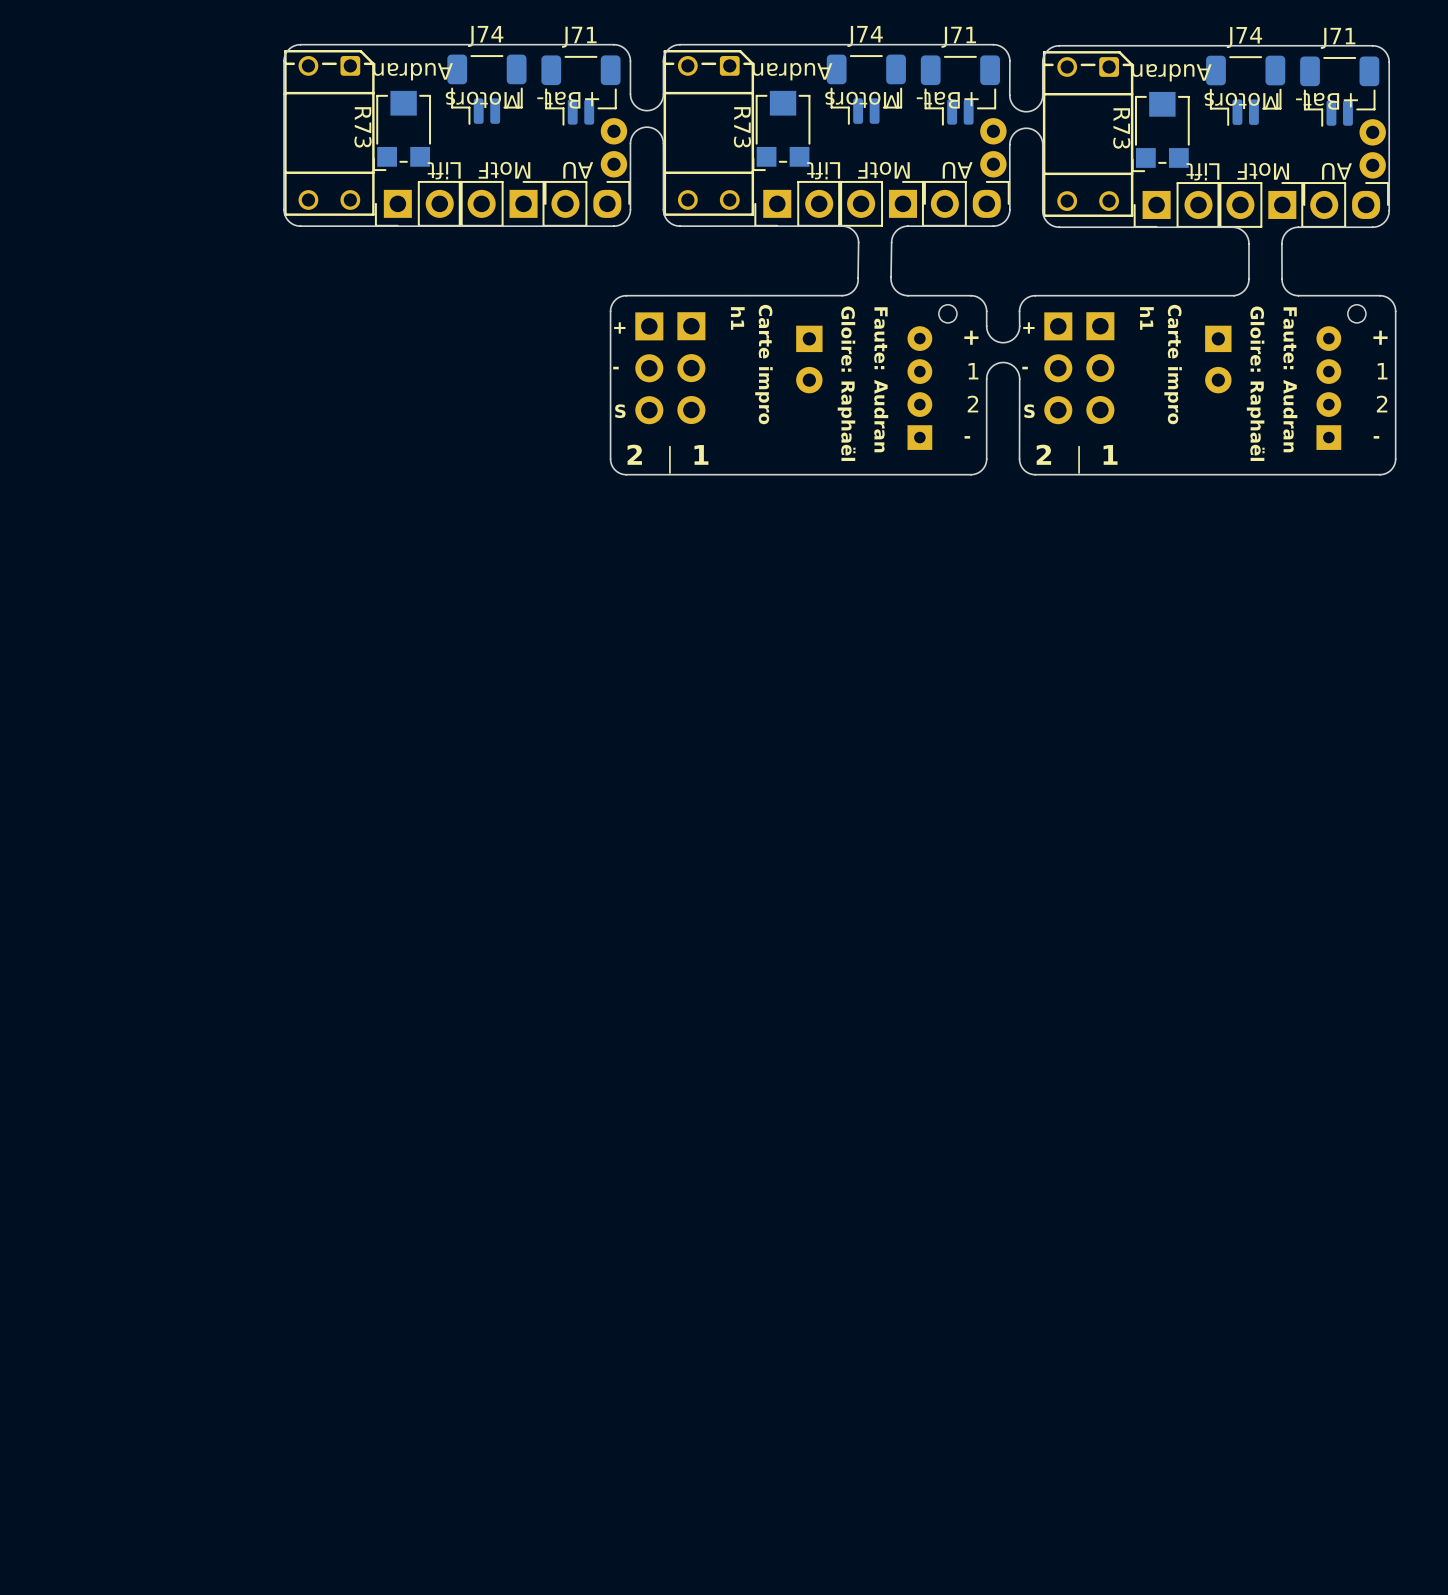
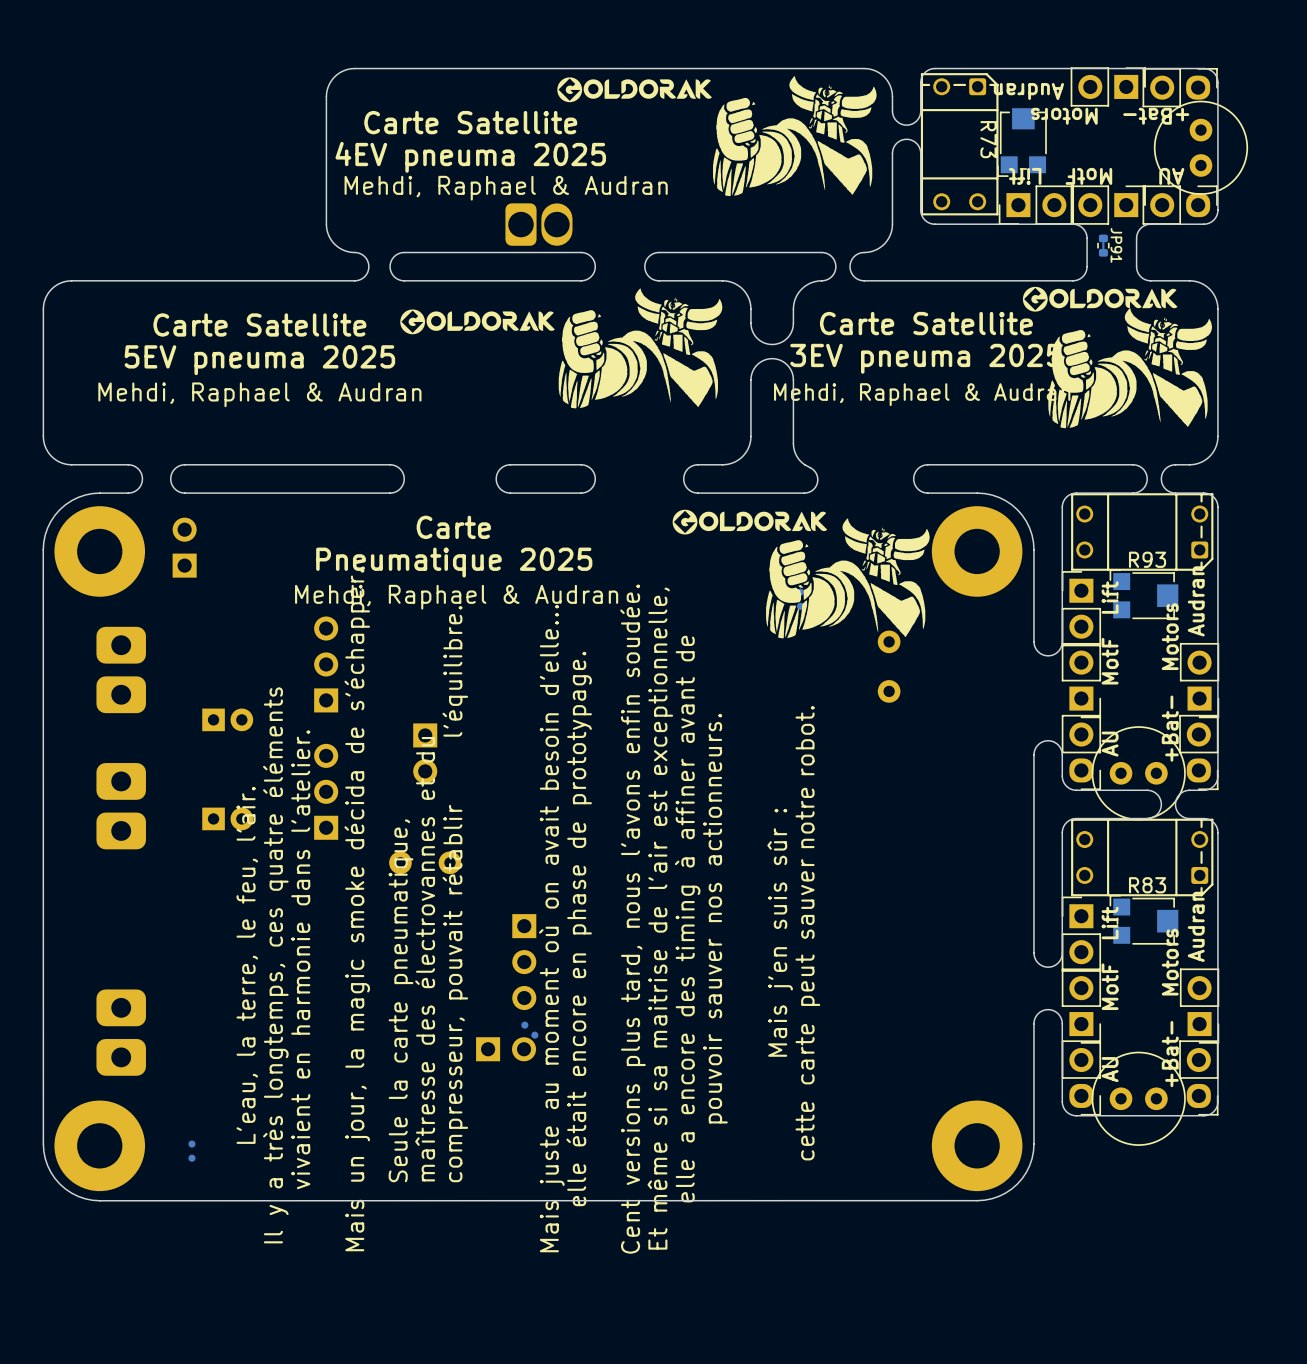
drawing: none -> [557, 76, 877, 197]
part: none -> (1108, 86)
part: none -> (1180, 87)
text: Audran (413, 71) -> none
text: Audran (792, 71) -> none
J74: (486, 89) -> none
J74: (866, 89) -> none
J71: (580, 90) -> none
J71: (960, 90) -> none
J74: (1245, 90) -> none
J71: (1339, 91) -> none
board edge: (1009, 95) (1008, 55) (1003, 48) (995, 44) (677, 44) (669, 48) (664, 56) (662, 100) (657, 107) (646, 110) (636, 107) (631, 100) (630, 57) (625, 49) (617, 45) (298, 44) (288, 49) (284, 59) (284, 211) (290, 222) (300, 226) (617, 225) (626, 219) (630, 211) (630, 139) (637, 130) (646, 127) (656, 130) (662, 139) (663, 211) (667, 219) (672, 224) (679, 226) (842, 226) (853, 230) (858, 240) (858, 281) (854, 290) (845, 295) (626, 295) (615, 300) (610, 311) (610, 459) (615, 470) (626, 474) (975, 474) (982, 470) (986, 461) (987, 375) (993, 365) (1003, 362) (1012, 365) (1019, 375) (1019, 461) (1022, 468) (1031, 474) (1385, 473) (1393, 466) (1395, 459) (1395, 307) (1389, 298) (1382, 295) (1298, 295) (1286, 290) (1282, 281) (1282, 238) (1286, 232) (1292, 228) (1310, 227) -> (892, 111) (892, 93) (888, 81) (879, 72) (867, 68) (348, 69) (339, 72) (332, 79) (326, 93) (326, 227) (329, 236) (337, 246) (345, 250) (360, 253) (365, 258) (368, 268) (363, 277) (354, 280) (71, 280) (59, 283) (49, 291) (44, 299) (43, 309) (43, 436) (46, 448) (54, 458) (65, 464) (131, 465) (139, 470) (142, 478) (139, 487) (131, 492) (92, 493) (71, 500) (59, 509) (50, 521) (43, 542) (43, 1144) (47, 1165) (55, 1178) (65, 1189) (85, 1198) (99, 1200) (984, 1200) (1005, 1193) (1017, 1184) (1026, 1172) (1032, 1158) (1033, 1144) (1034, 1021) (1038, 1013) (1046, 1009) (1056, 1012) (1061, 1020) (1062, 1103) (1068, 1113) (1076, 1115) (1203, 1115) (1212, 1112) (1217, 1101) (1217, 830) (1215, 824) (1209, 819) (1182, 816) (1177, 811) (1175, 804) (1177, 797) (1182, 792) (1208, 789) (1214, 784) (1217, 777) (1217, 505) (1213, 497) (1207, 493) (1170, 492) (1164, 487) (1161, 478) (1163, 471) (1168, 466) (1201, 461) (1209, 456) (1216, 445) (1217, 305) (1211, 291) (1199, 282) (1149, 280) (1139, 275) (1136, 268) (1136, 235) (1141, 227) (1150, 224)
text: +Bat- Motors (522, 100) -> none
text: +Bat- Motors (901, 100) -> none
text: none -> Carte Satellite (470, 122)
part footprint: [1359, 119, 1386, 179] -> [1153, 100, 1249, 195]
R73: (401, 130) -> none
R73: (781, 130) -> none
part: (329, 132) -> none
part: (708, 132) -> none
board edge: (1009, 144) (1009, 211) (1003, 222) (993, 226) (906, 226) (896, 230) (891, 240) (891, 280) (896, 291) (906, 295) (971, 295) (978, 297) (986, 307) (987, 332) (997, 341) (1007, 342) (1016, 335) (1019, 328) (1020, 305) (1025, 298) (1033, 295) (1234, 295) (1239, 293) (1245, 288) (1248, 281) (1248, 238) (1244, 232) (1237, 228) (1220, 227) -> (892, 153) (891, 230) (888, 239) (879, 248) (858, 253) (852, 258) (850, 270) (858, 279) (1076, 280) (1082, 276) (1086, 269) (1087, 238) (1082, 228) (1072, 224)
part: (613, 147) -> none
part: (993, 147) -> none
text: none -> 4EV pneuma 2025 (470, 157)
text: AU MotF Lift (510, 170) -> none
text: AU MotF Lift (889, 170) -> none
text: none -> Mehdi, Raphael & Audran (506, 188)
part: (418, 203) -> none
part: (502, 203) -> none
part: (586, 203) -> none
part: (798, 203) -> none
part: (882, 203) -> none
part: (965, 203) -> none
part: none -> (538, 224)
JP91: none -> (1103, 245)
board edge: none -> (581, 252) (402, 252) (393, 258) (390, 268) (394, 276) (404, 280) (582, 280) (592, 275) (595, 264) (591, 256) (581, 252)
board edge: none -> (821, 252) (657, 252) (647, 258) (644, 268) (648, 276) (657, 280) (722, 280) (737, 285) (744, 291) (749, 299) (751, 326) (753, 333) (764, 342) (774, 344) (785, 340) (791, 331) (794, 302) (799, 291) (809, 283) (827, 279) (833, 273) (835, 266) (833, 259) (828, 254) (821, 252)
drawing: none -> [1022, 286, 1212, 429]
drawing: none -> [400, 288, 723, 409]
text: h1 (737, 318) -> none
text: h1 (1146, 318) -> none
text: + (619, 327) -> none
text: + (1028, 327) -> none
drawing: [964, 330, 979, 413] -> none
drawing: [1373, 330, 1388, 413] -> none
text: Faute: (880, 338) -> none
text: Faute: (1290, 338) -> none
text: Gloire: (848, 339) -> none
text: Gloire: (1257, 339) -> none
text: none -> Carte Satellite (926, 323)
text: none -> Carte Satellite (259, 324)
part: (809, 359) -> none
part: (1218, 359) -> none
text: Carte impro (763, 364) -> none
text: Carte impro (1173, 364) -> none
text: - (615, 368) -> none
part: (649, 368) -> none
part: (691, 368) -> none
text: - (1025, 368) -> none
part: (1058, 368) -> none
part: (1100, 368) -> none
part: (932, 377) -> none
part: (1341, 377) -> none
text: none -> 3EV pneuma 2025 (925, 358)
text: none -> 5EV pneuma 2025 (259, 360)
board edge: none -> (793, 379) (794, 449) (800, 460) (816, 473) (817, 481) (814, 488) (804, 493) (697, 493) (687, 488) (683, 477) (690, 466) (728, 464) (740, 458) (746, 451) (750, 439) (751, 377) (757, 364) (769, 358) (780, 360) (789, 366) (793, 379)
text: S (620, 411) -> none
text: S (1029, 411) -> none
text: Audran (881, 416) -> none
text: Audran (1290, 416) -> none
text: Raphaël (846, 421) -> none
text: Raphaël (1255, 421) -> none
text: none -> Mehdi, Raphael & Audran (259, 394)
text: none -> Mehdi, Raphael & Audran (922, 394)
text: - (967, 437) -> none
text: - (1376, 437) -> none
line: (669, 446) (669, 473) -> none
line: (1079, 446) (1079, 473) -> none
text: 2 (634, 454) -> none
text: 1 (701, 454) -> none
text: 2 (1043, 454) -> none
text: 1 (1110, 454) -> none
board edge: none -> (390, 464) (183, 464) (173, 470) (170, 480) (174, 488) (184, 493) (391, 492) (401, 487) (404, 477) (400, 468) (390, 464)
board edge: none -> (581, 464) (506, 465) (498, 471) (496, 482) (500, 488) (508, 492) (584, 492) (592, 487) (595, 477) (591, 468) (581, 464)
board edge: none -> (1133, 464) (926, 464) (916, 470) (913, 480) (917, 488) (926, 492) (992, 495) (1005, 500) (1022, 515) (1029, 528) (1033, 542) (1034, 643) (1039, 652) (1049, 655) (1058, 651) (1062, 643) (1063, 501) (1068, 495) (1074, 493) (1133, 493) (1140, 491) (1146, 484) (1146, 475) (1141, 467) (1133, 464)
drawing: none -> [672, 509, 930, 639]
text: none -> Carte (453, 527)
part: none -> (1142, 532)
part: none -> (184, 547)
part: none -> (99, 551)
part: none -> (977, 551)
text: none -> Pneumatique 2025 (454, 562)
R93: none -> (1143, 594)
text: none -> Mehdi, Raphael & Audran (456, 597)
part: none -> (800, 599)
text: none -> Audran (1196, 601)
part: none -> (1081, 608)
part: none -> (326, 664)
part: none -> (889, 666)
part: none -> (121, 669)
part: none -> (1081, 680)
part: none -> (1199, 680)
text: none -> AU MotF Lift (1110, 668)
text: none -> +Bat- Motors (1170, 682)
part: none -> (227, 719)
part: none -> (1081, 752)
part: none -> (1198, 752)
part: none -> (425, 753)
board edge: none -> (1062, 754) (1062, 779) (1070, 788) (1149, 790) (1158, 795) (1161, 806) (1157, 814) (1149, 818) (1074, 818) (1065, 823) (1062, 832) (1062, 954) (1056, 964) (1046, 967) (1038, 963) (1033, 953) (1034, 753) (1038, 744) (1048, 740) (1058, 744) (1062, 754)
part: none -> (1138, 773)
part: none -> (326, 791)
part: none -> (121, 806)
part: none -> (227, 818)
part: none -> (1142, 857)
part: none -> (425, 862)
text: none -> Mais un jour, la magic smoke décida de s'échapper. (357, 910)
text: none -> Cent versions plus tard, nous l'avons enfin soudée. (632, 919)
text: none -> Et même si sa maitrise de l'air est exceptionnelle, (660, 918)
text: none -> elle a encore des timing à affiner avant de (687, 919)
text: none -> pouvoir sauver nos actionneurs. (715, 918)
R83: none -> (1143, 919)
text: none -> Mais juste au moment où on avait besoin d'elle… (551, 928)
text: none -> elle était encore en phase de prototypage. (579, 928)
text: none -> Audran (1196, 926)
text: none -> Mais j'en suis sûr : (780, 932)
text: none -> compresseur, pouvait rétablir l'équilibre. (455, 894)
text: none -> cette carte peut sauver notre robot. (807, 933)
part: none -> (1081, 934)
part: none -> (524, 962)
text: none -> vivaient en harmonie dans l'atelier. (300, 959)
text: none -> Il y a très longtemps, ces quatre éléments (275, 965)
text: none -> L'eau, la terre, le feu, l'air. (247, 965)
text: none -> maîtresse des électrovannes et du (425, 959)
part: none -> (1081, 1006)
part: none -> (1199, 1006)
text: none -> AU MotF Lift (1110, 994)
text: none -> Seule la carte pneumatique, (401, 1000)
text: none -> +Bat- Motors (1170, 1007)
part: none -> (529, 1030)
part: none -> (121, 1032)
part: none -> (506, 1049)
part: none -> (1081, 1077)
part: none -> (1198, 1077)
part: none -> (1138, 1098)
part: none -> (99, 1145)
part: none -> (977, 1145)
part: none -> (191, 1151)

